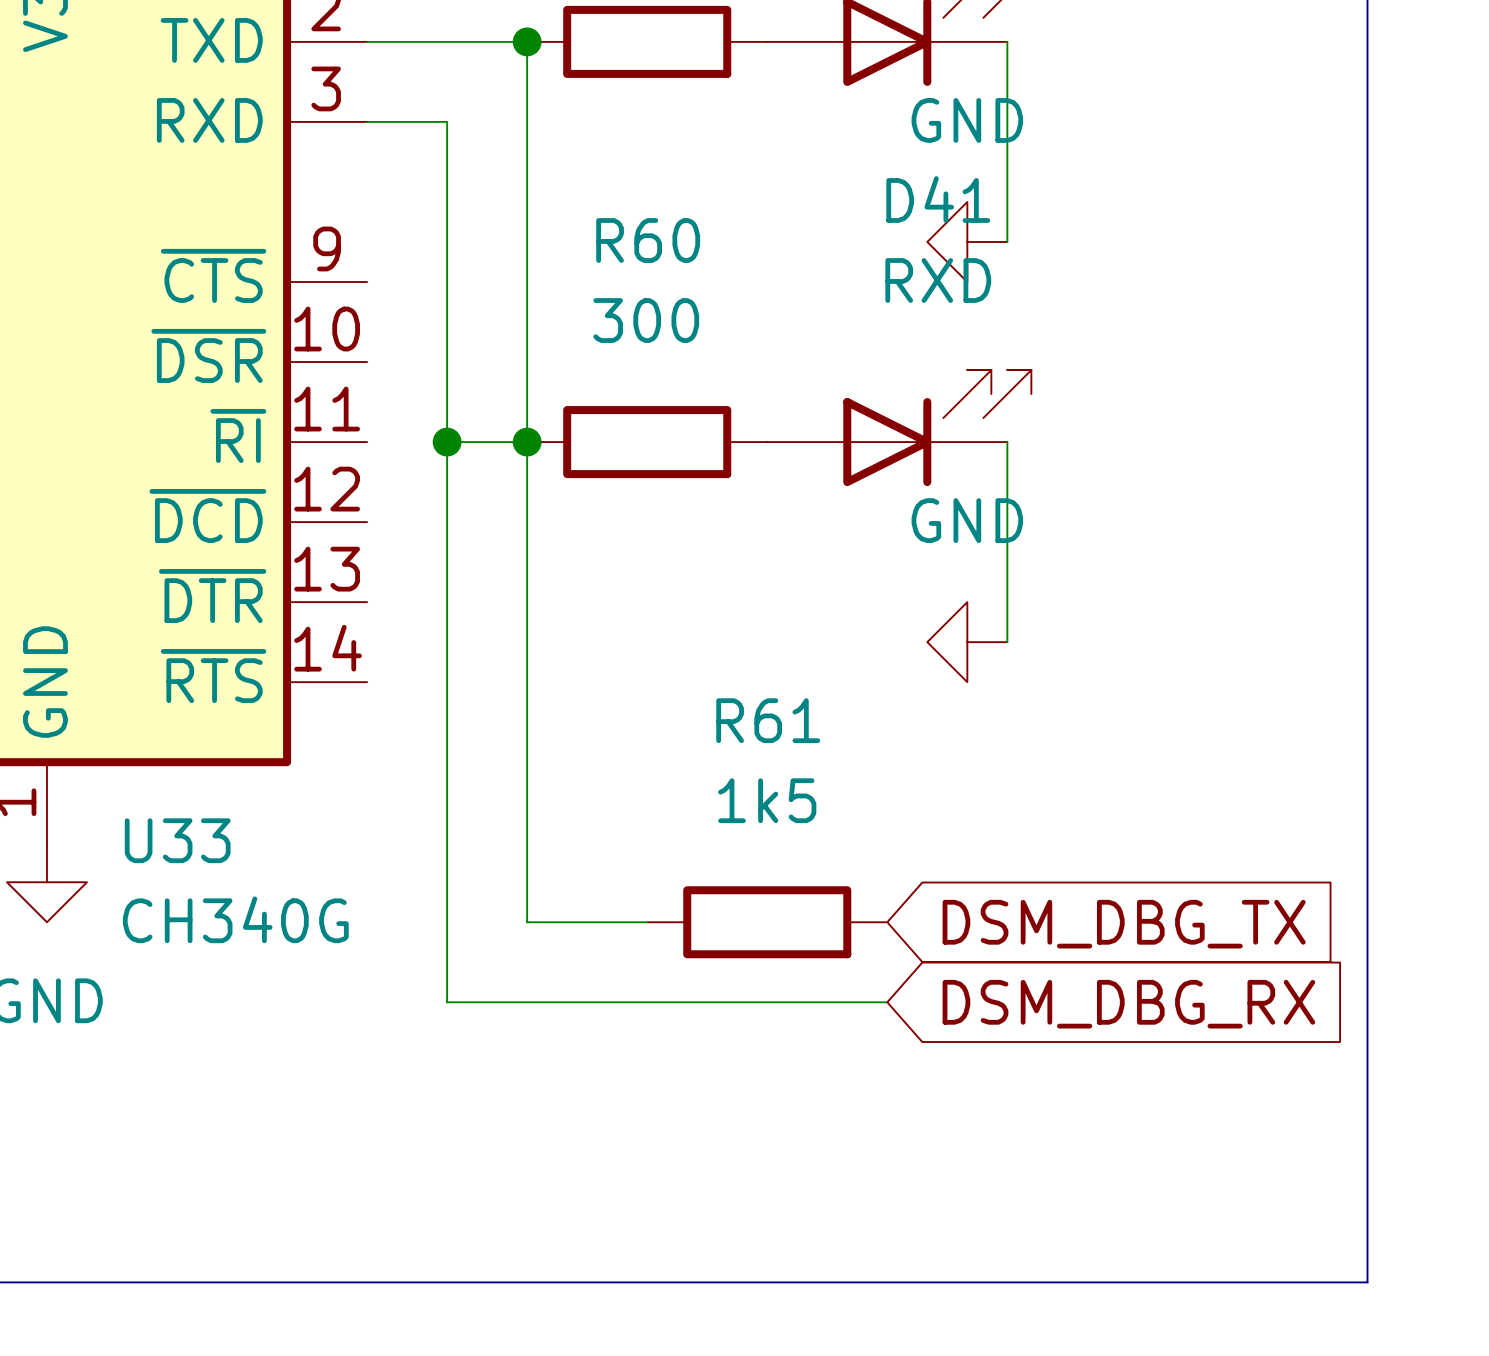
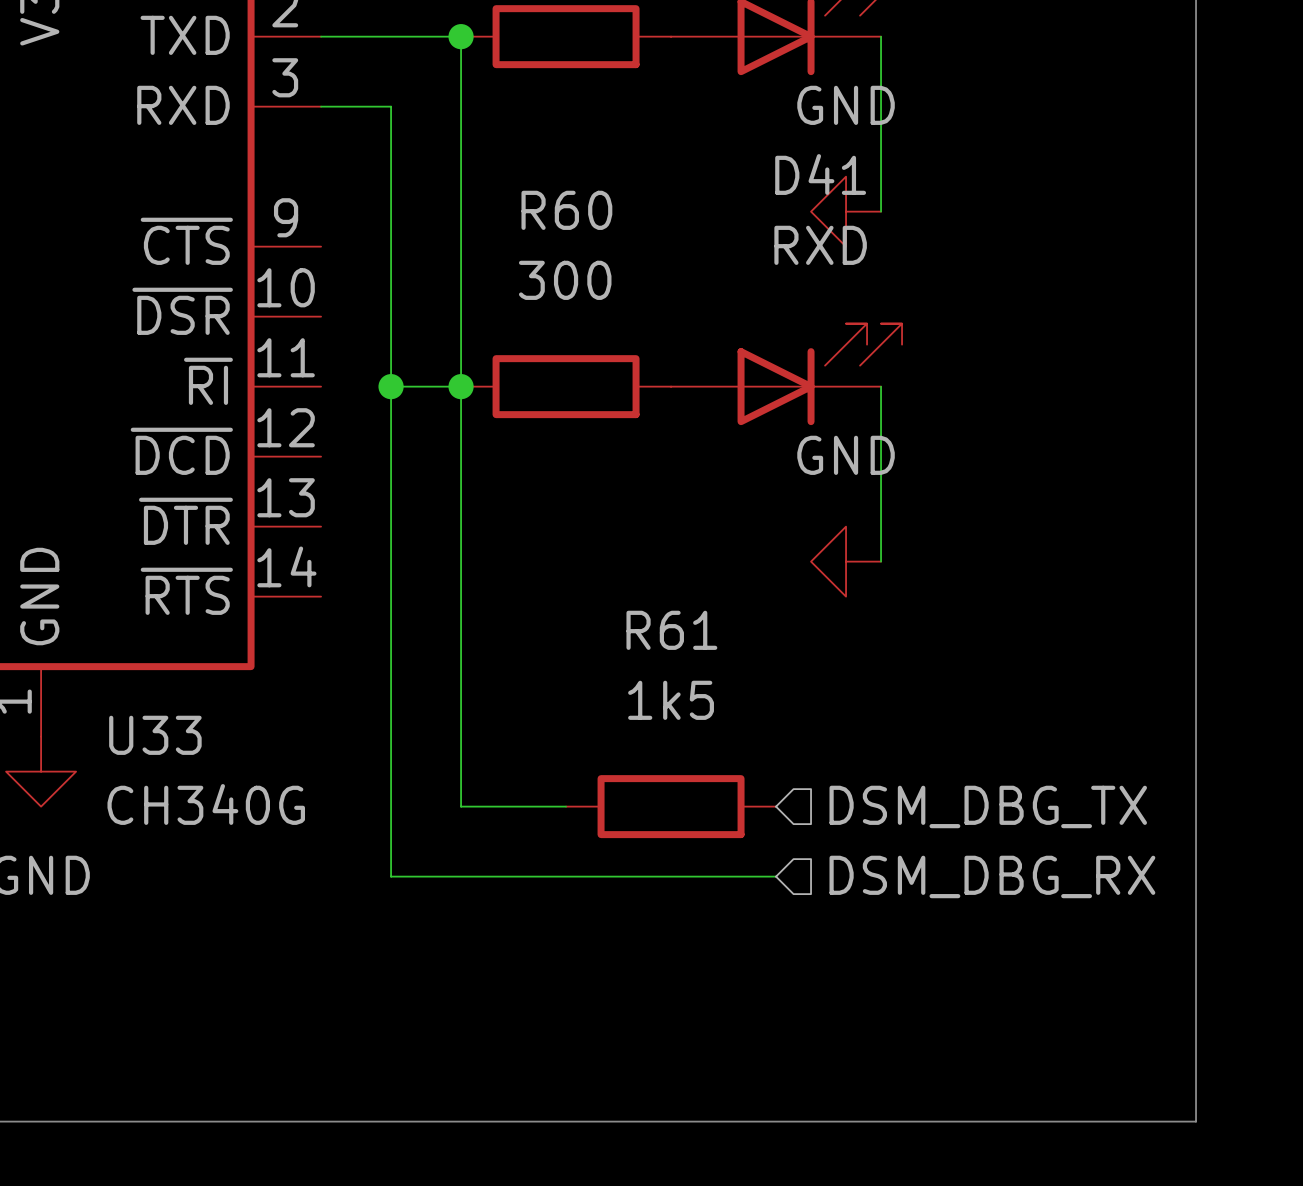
hierarchical label: none -> DSM_DBG_TX (988, 806)
global label: DSM_DBG_TX (1124, 924) -> none
hierarchical label: none -> DSM_DBG_RX (992, 876)
global label: DSM_DBG_RX (1128, 1004) -> none

